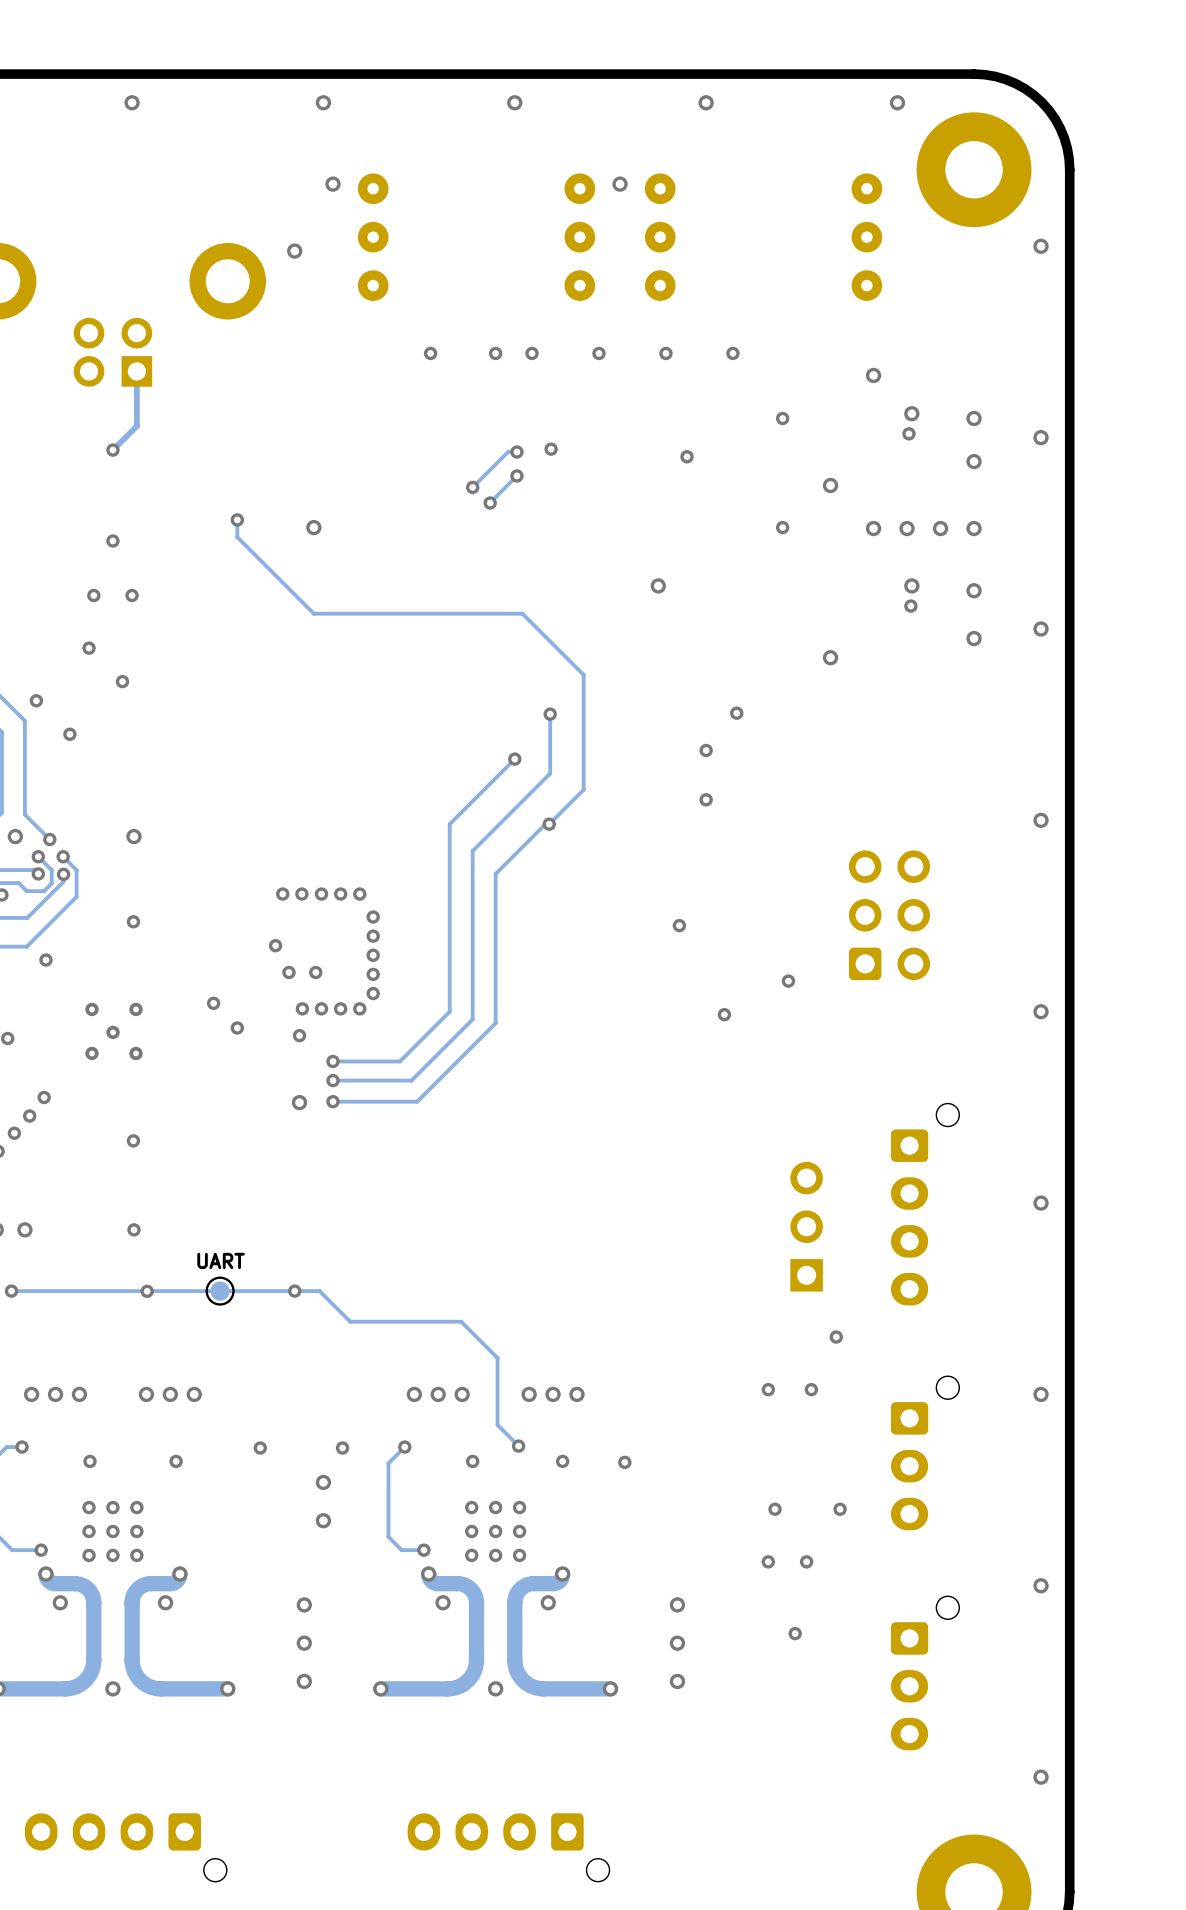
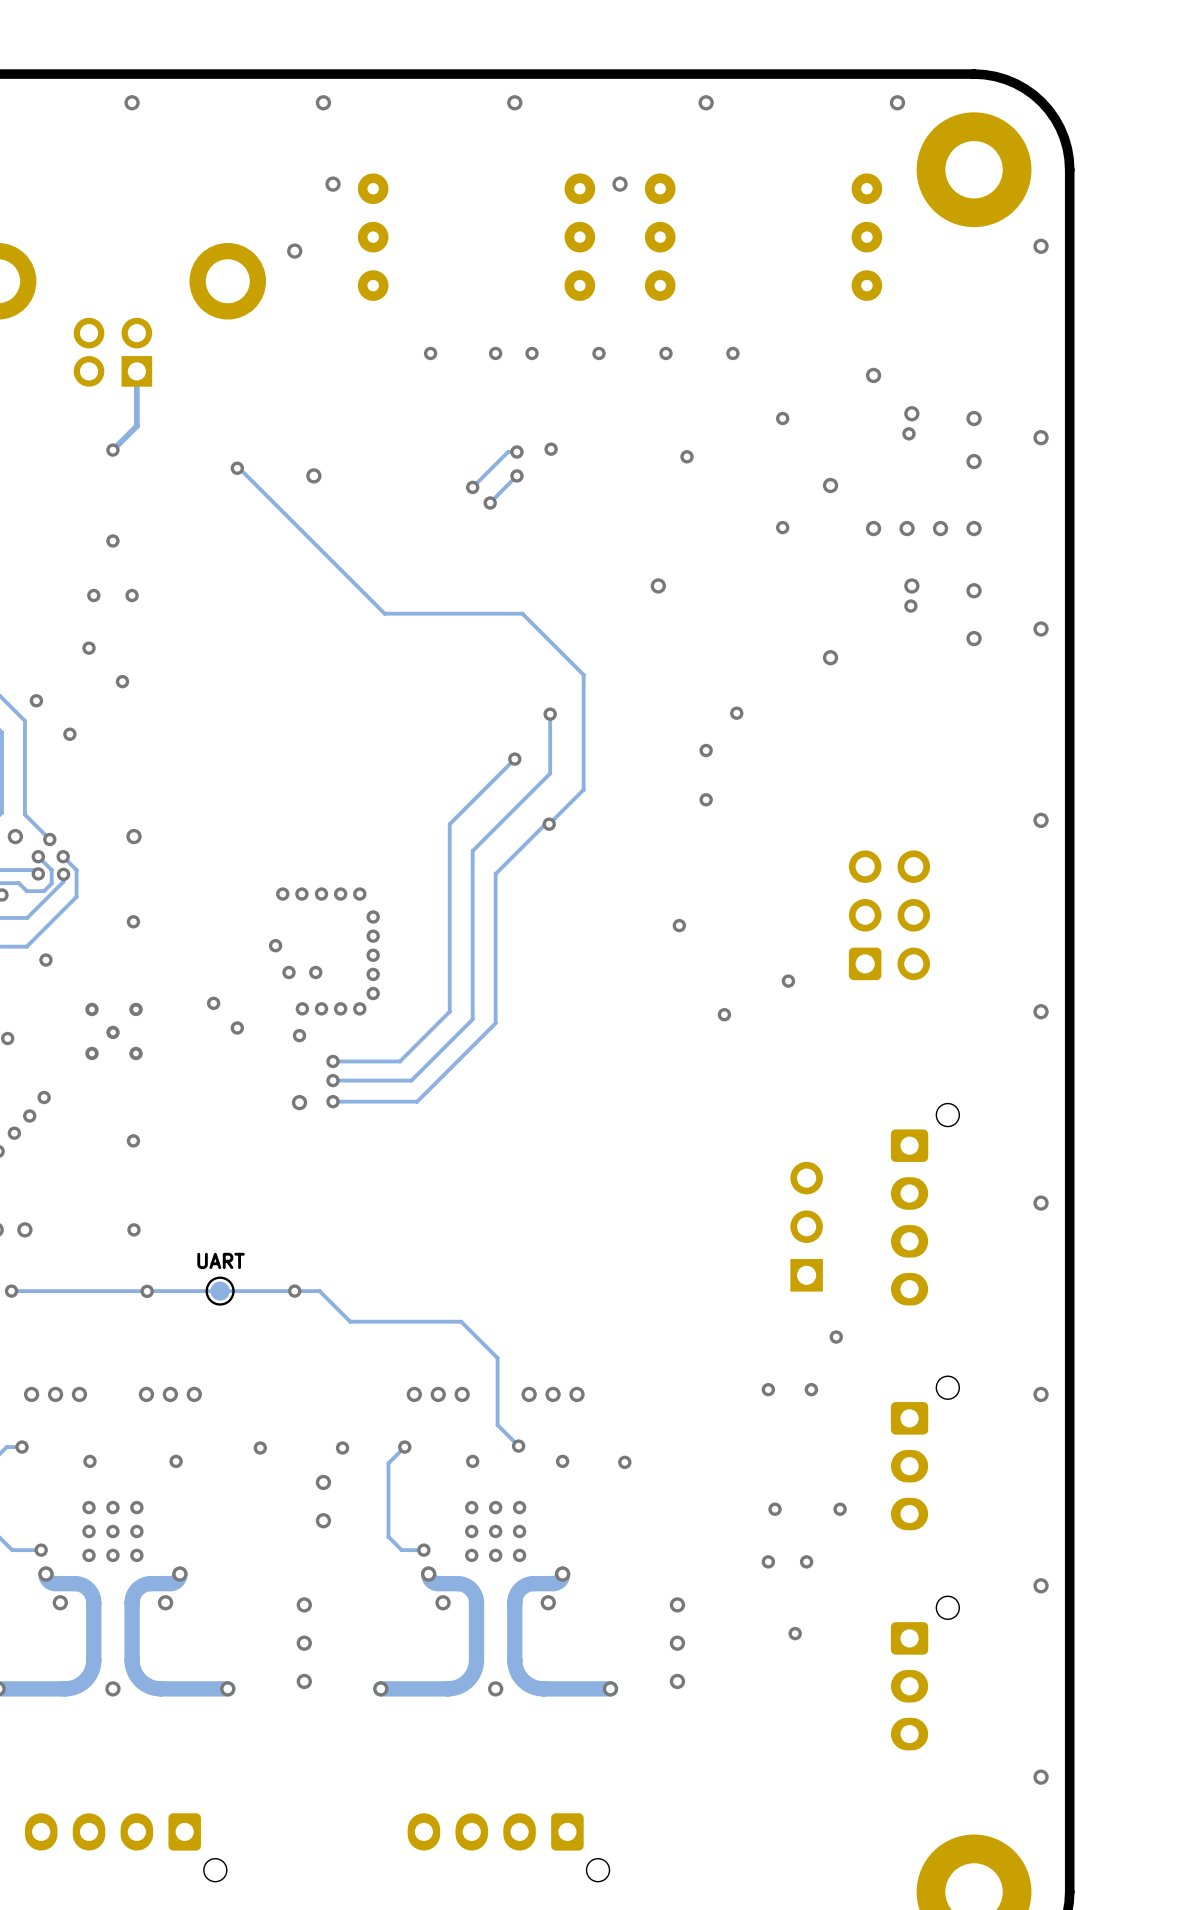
track: (237, 519) (237, 537) (313, 613) (384, 613) -> (237, 468) (384, 613)
via position: (237, 519) -> (237, 468)
via position: (313, 527) -> (313, 475)

